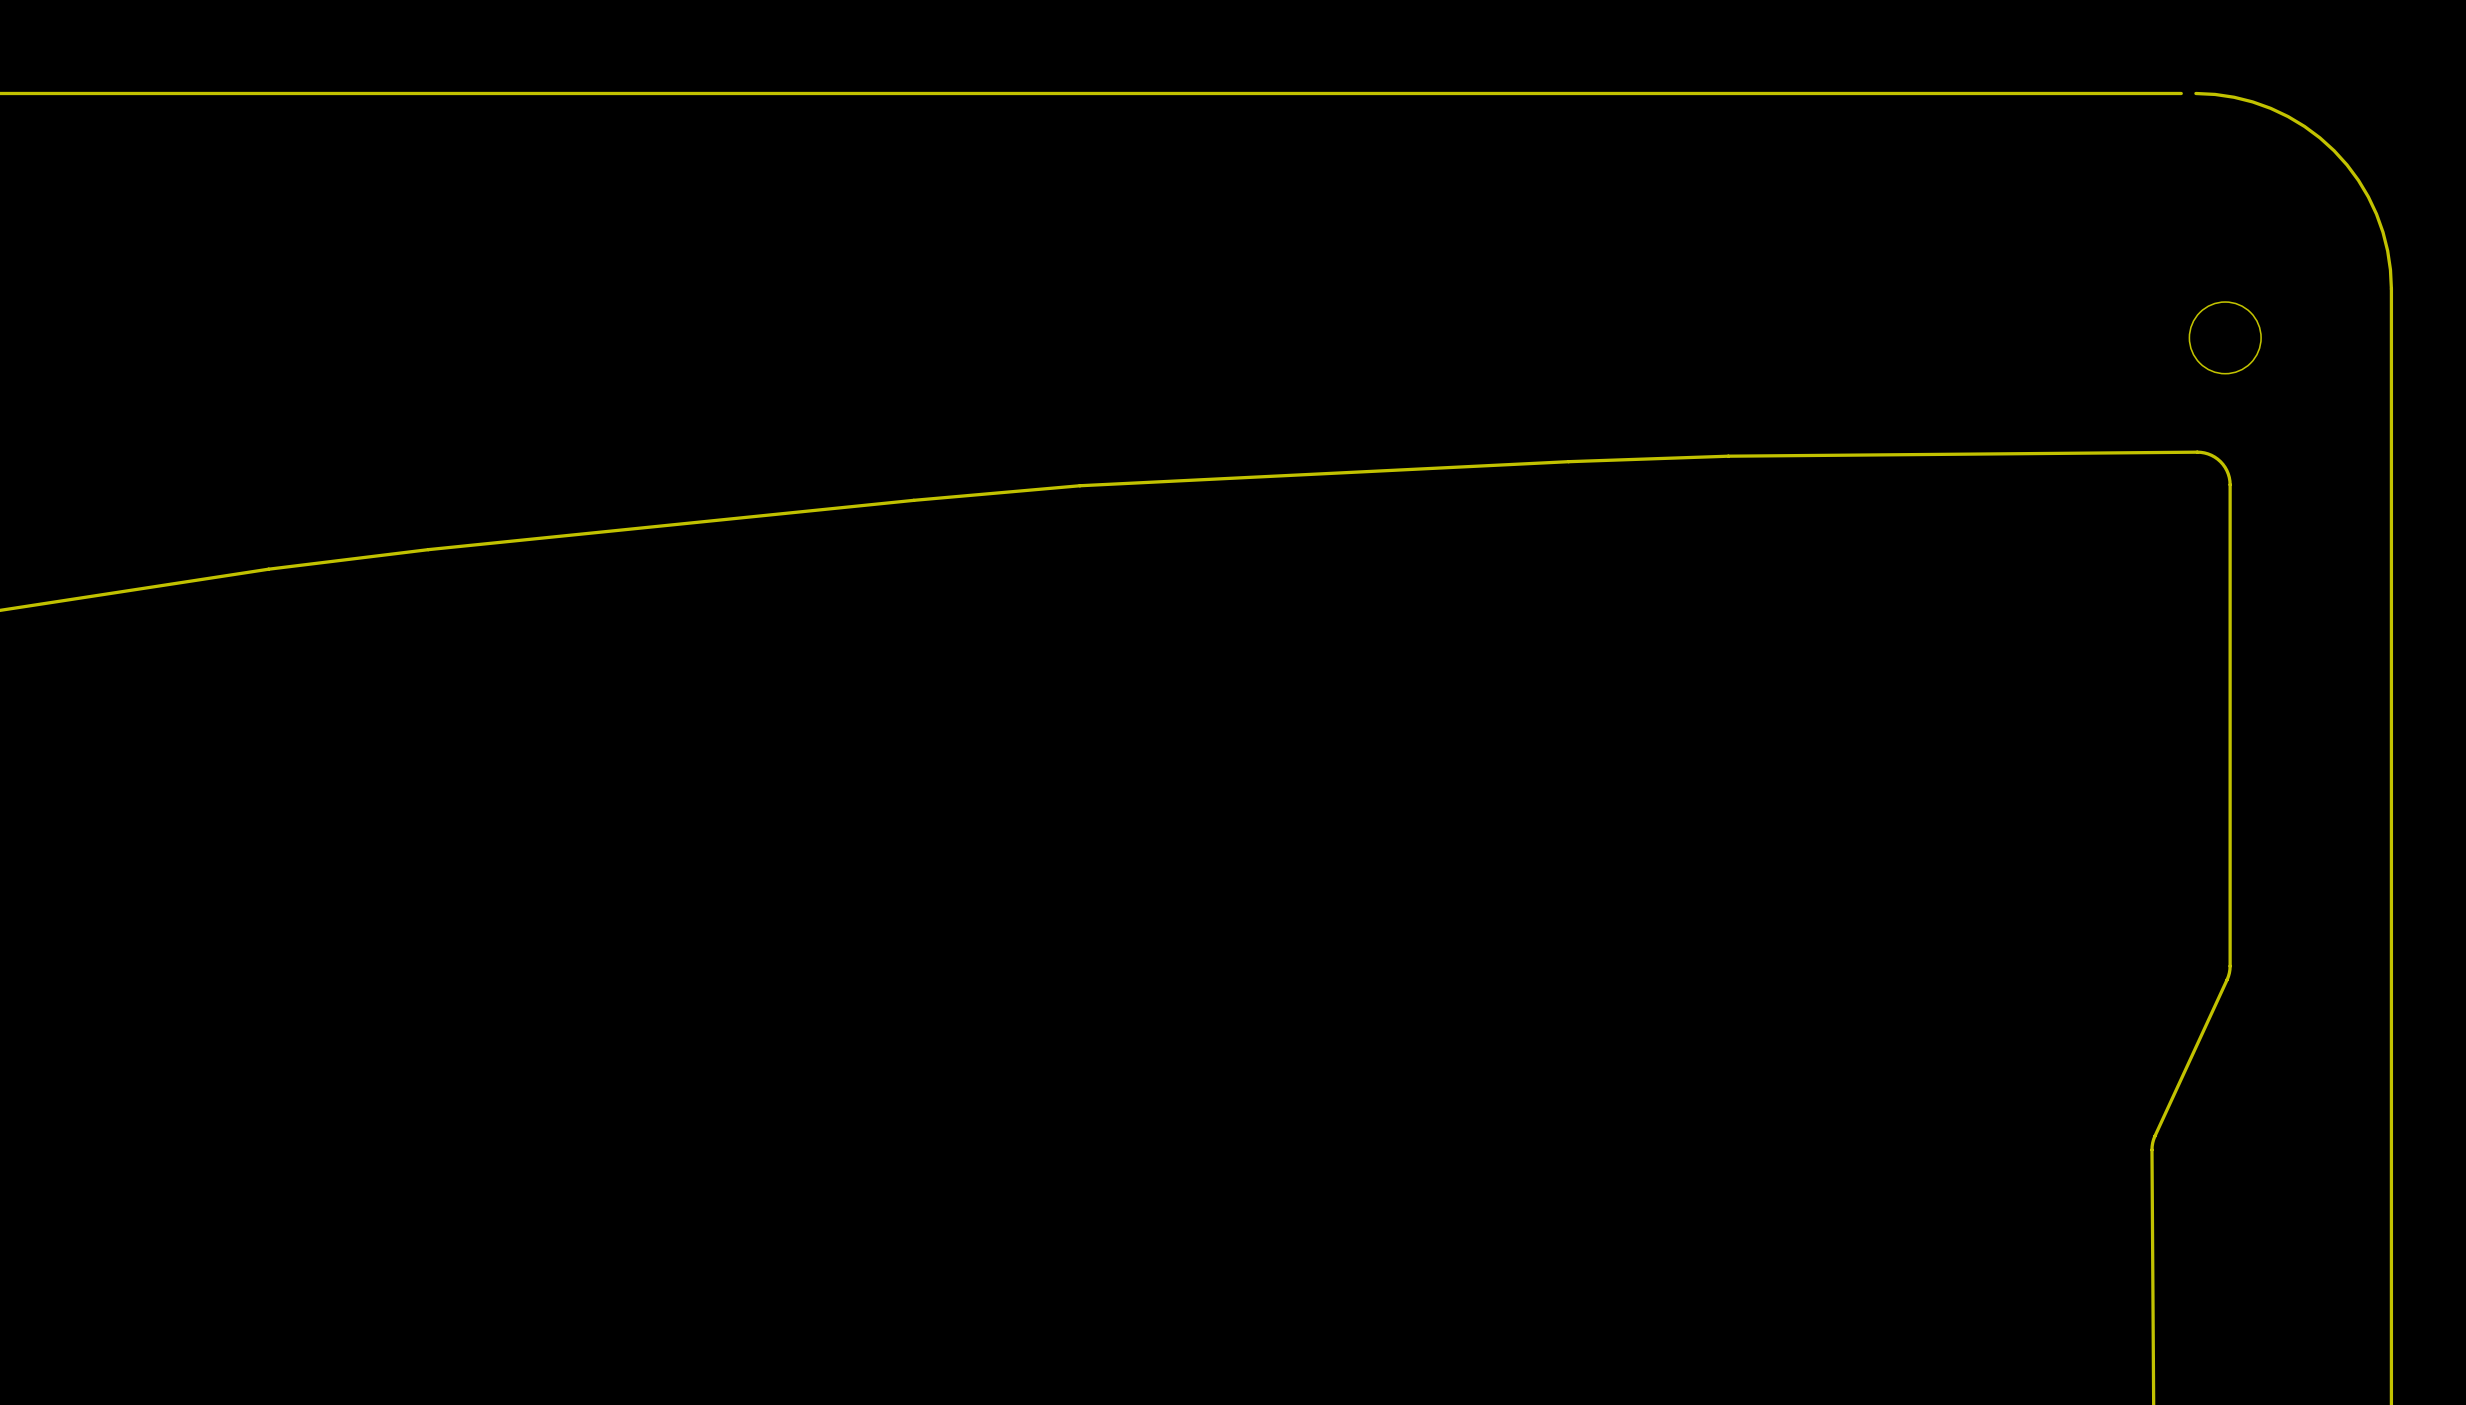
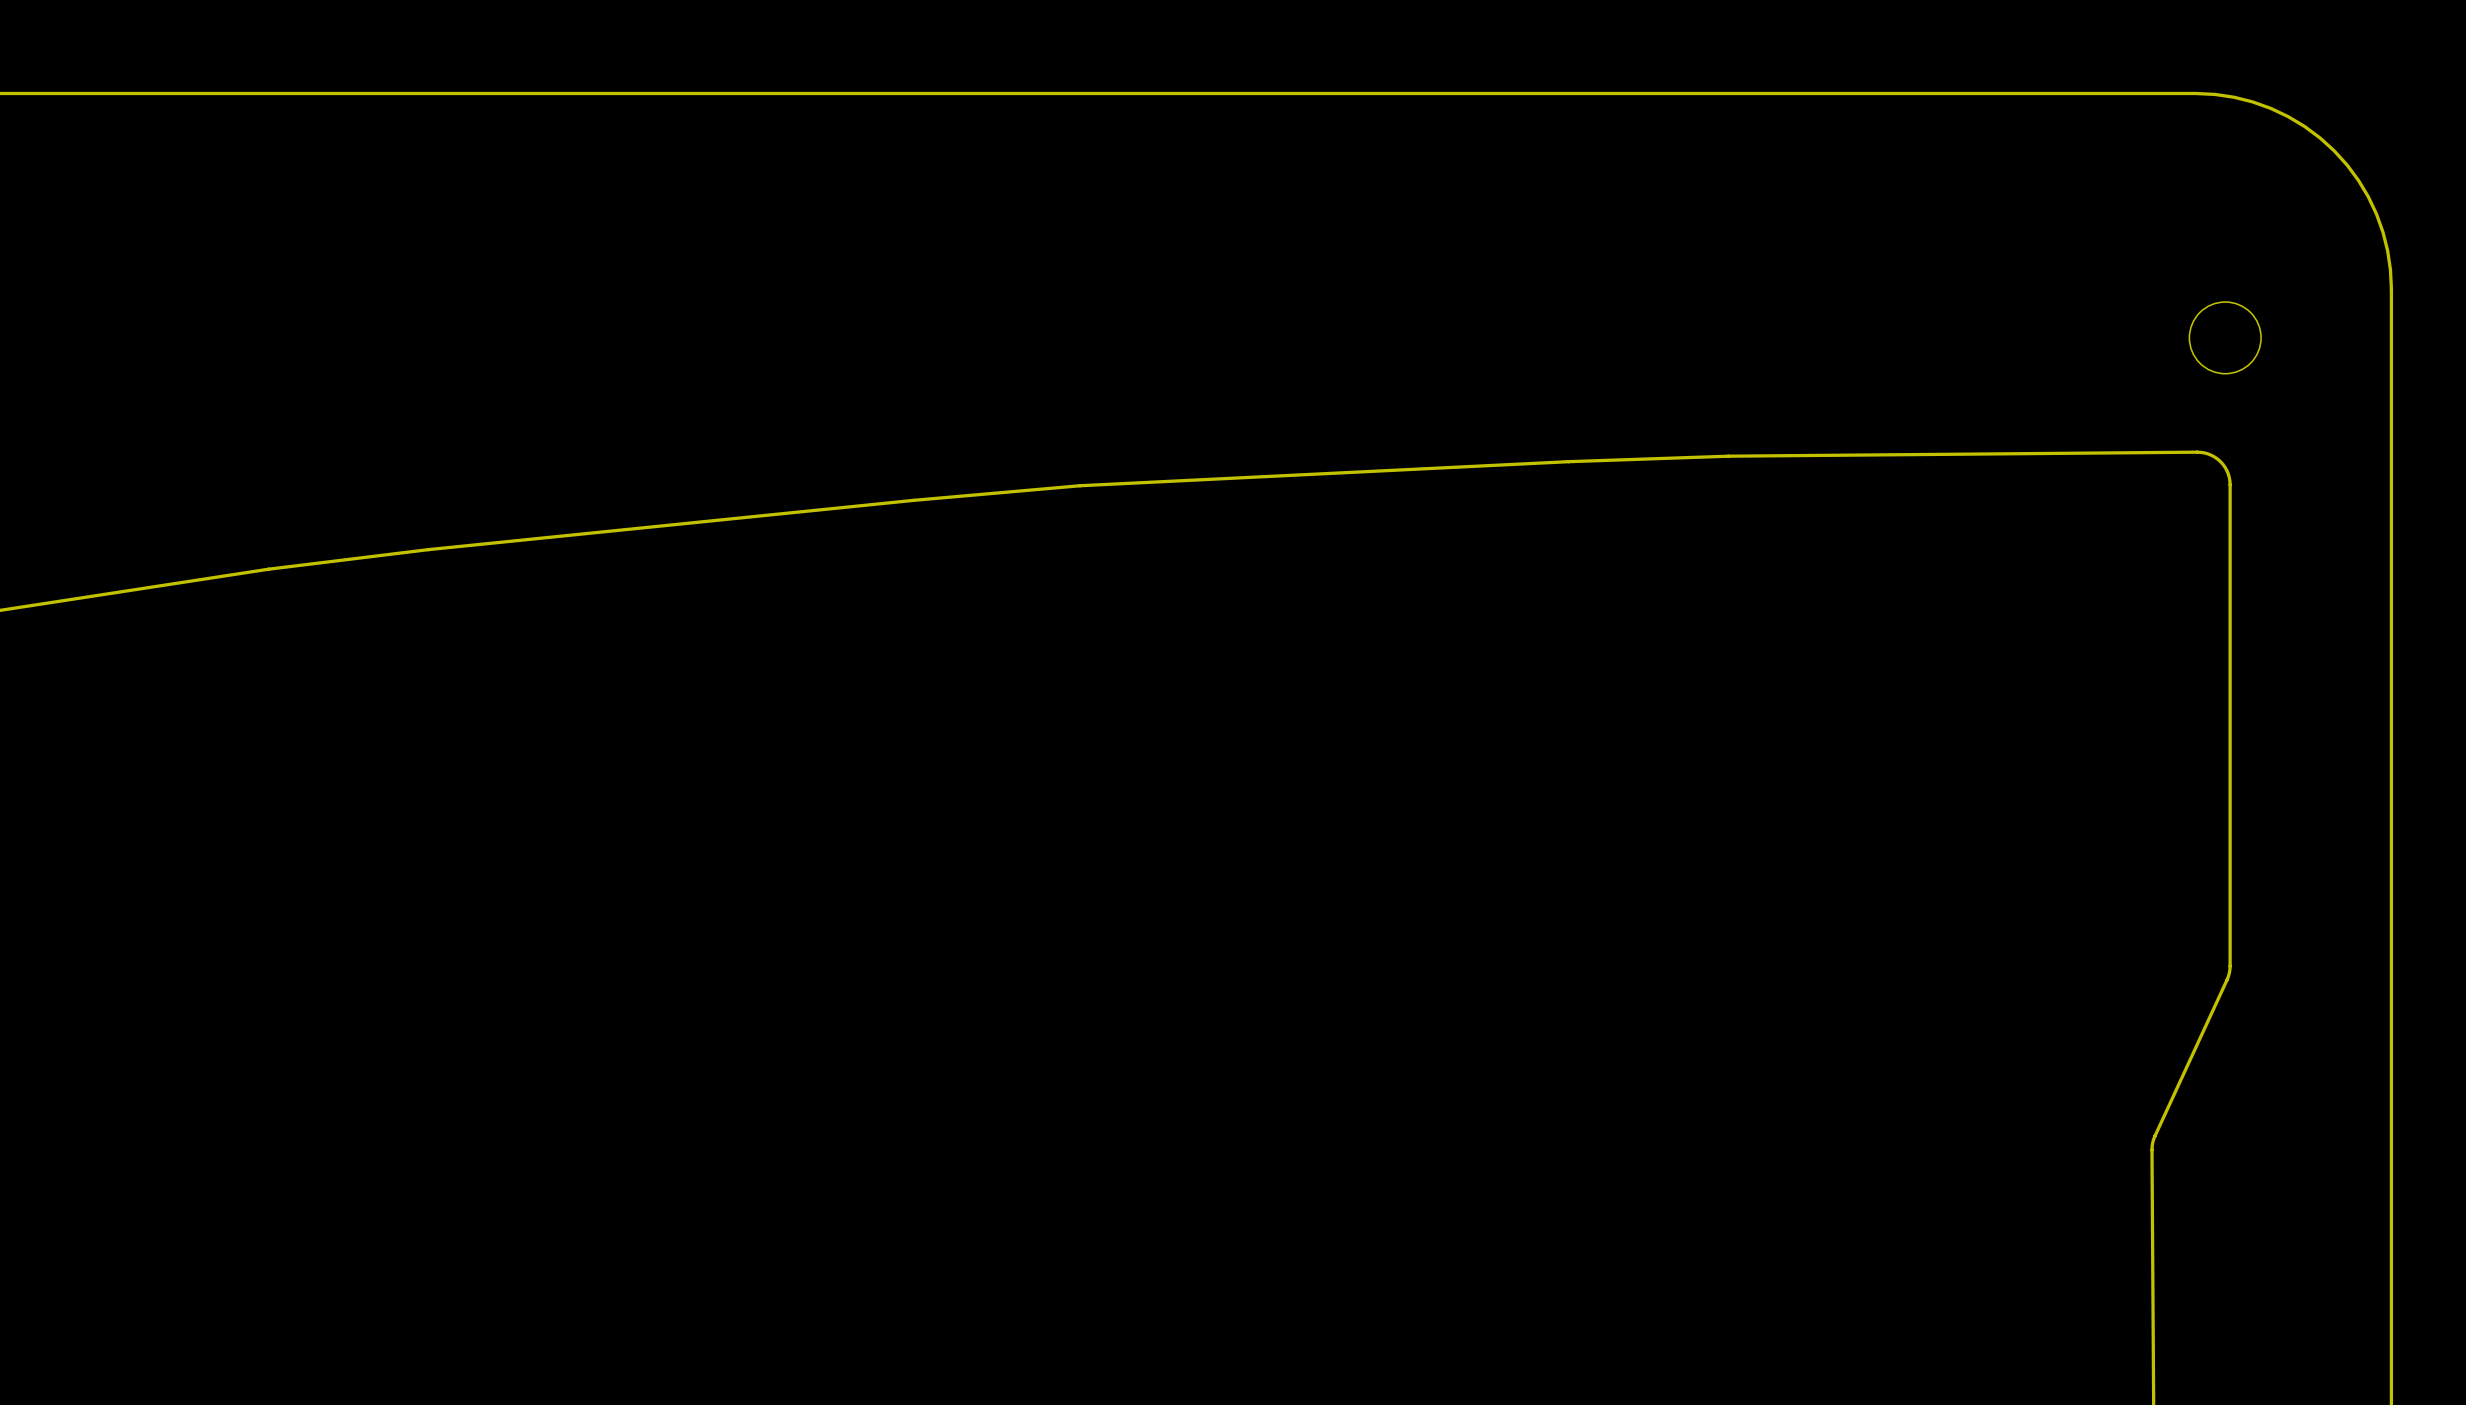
board edge: none -> (2195, 93) (2181, 93)

